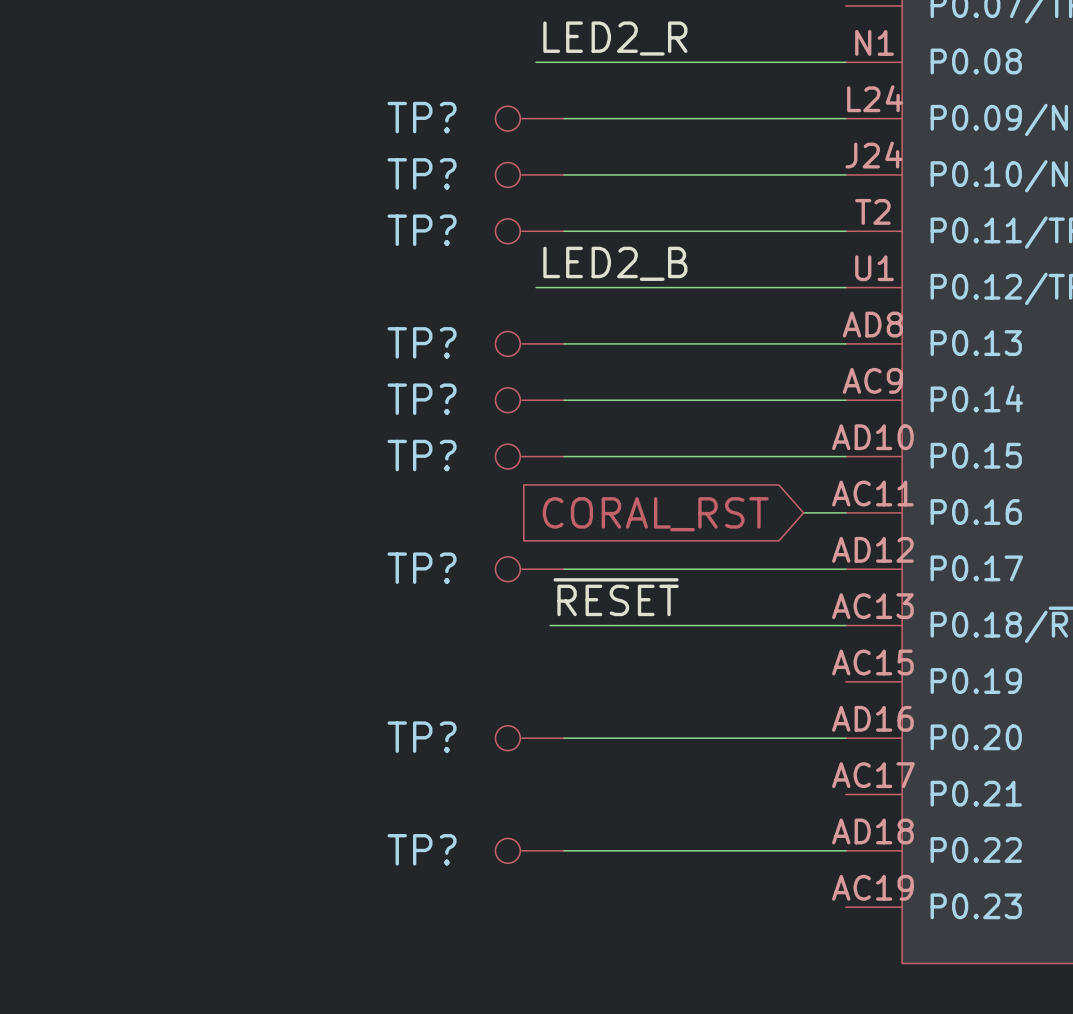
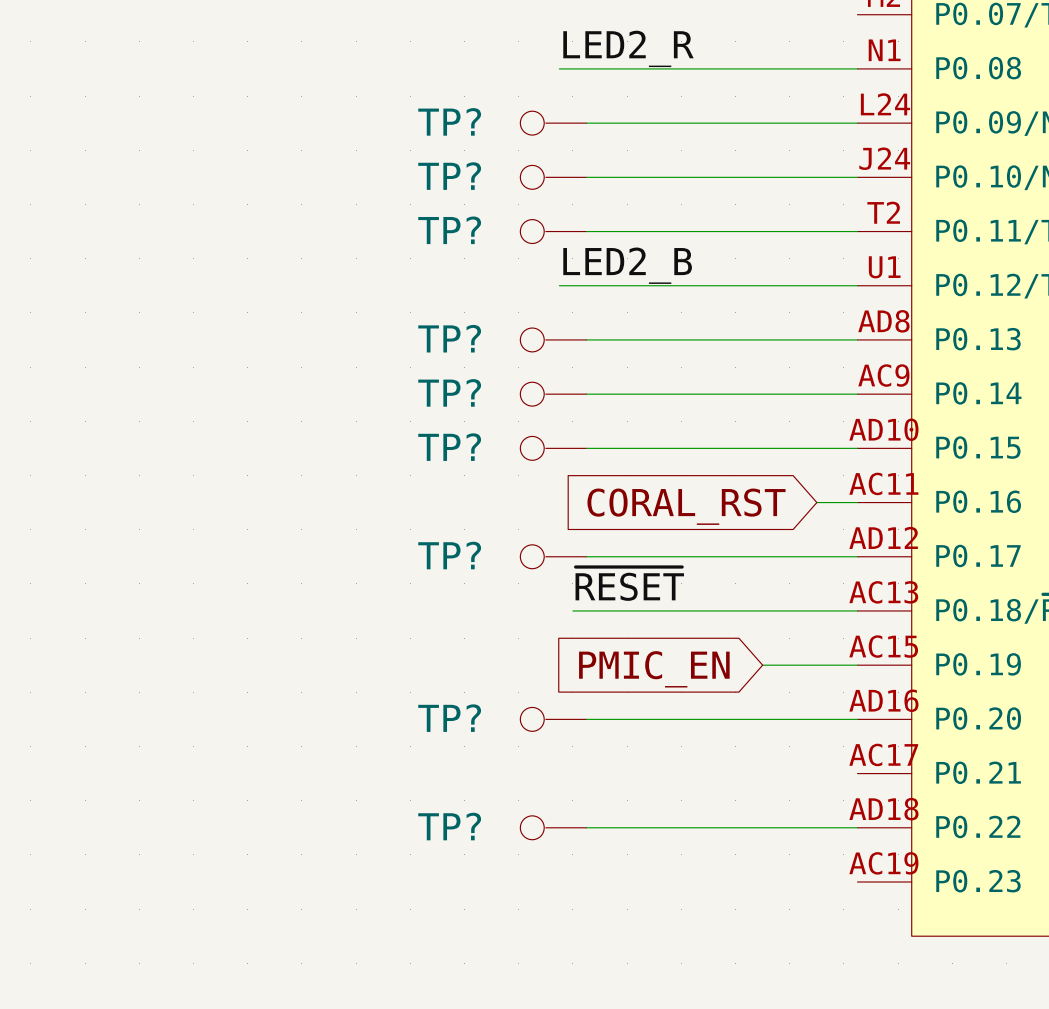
wire: none -> (762, 665) (857, 665)
global label: none -> PMIC_EN (654, 669)

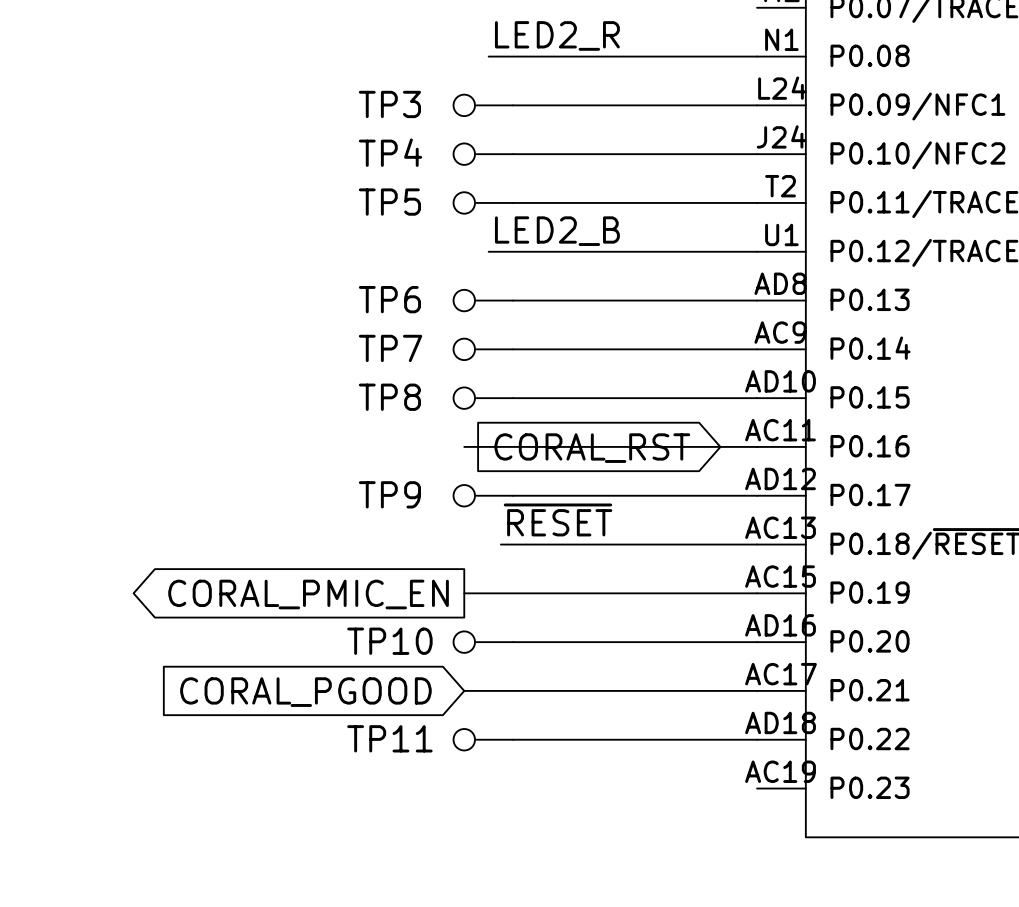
TP? name: TP? (449, 121) -> TP3 (389, 104)
TP? name: TP? (449, 176) -> TP4 (390, 152)
TP? name: TP? (449, 230) -> TP5 (389, 202)
TP? name: TP? (449, 338) -> TP6 (389, 299)
TP? name: TP? (449, 392) -> TP7 (390, 348)
TP? name: TP? (449, 447) -> TP8 (389, 397)
wire: none -> (464, 446) (720, 446)
TP? name: TP? (449, 555) -> TP9 (389, 494)
wire: none -> (464, 593) (671, 593)
global label shape: input (654, 669) -> output (308, 594)
global label: PMIC_EN (654, 669) -> CORAL_PMIC_EN (308, 594)
TP? name: TP? (449, 718) -> TP10 (389, 641)
wire: none -> (464, 690) (757, 690)
global label: none -> CORAL_PGOOD (305, 692)
TP? name: TP? (449, 826) -> TP11 (389, 738)

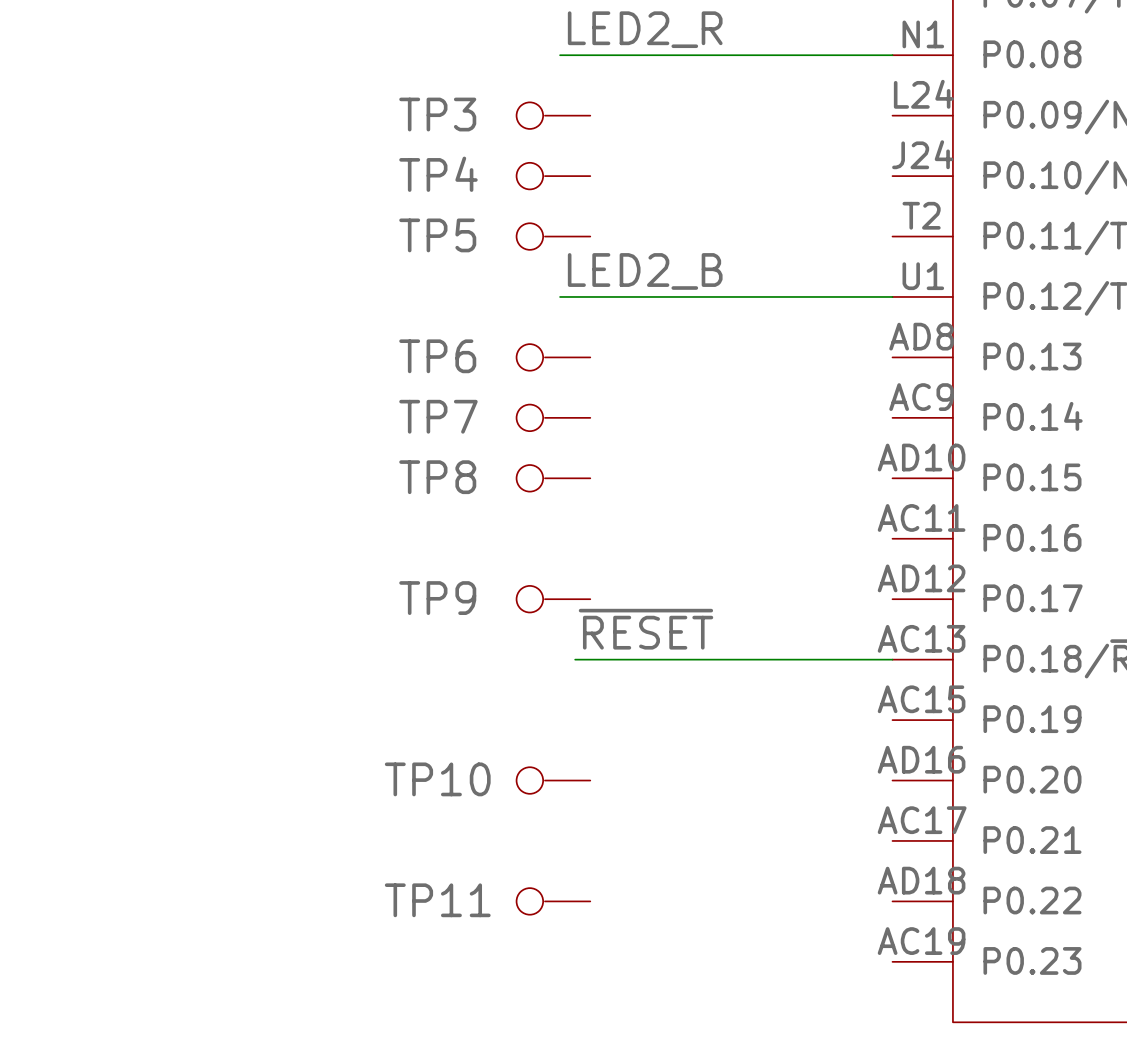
wire: (513, 105) (757, 105) -> none
wire: (513, 154) (757, 154) -> none
wire: (513, 202) (757, 202) -> none
wire: (513, 300) (757, 300) -> none
wire: (513, 349) (757, 349) -> none
wire: (513, 398) (757, 398) -> none
wire: (464, 446) (757, 446) -> none
global label: CORAL_RST (592, 448) -> none
wire: (513, 495) (757, 495) -> none
wire: (464, 593) (757, 593) -> none
global label: CORAL_PMIC_EN (308, 594) -> none
wire: (513, 642) (757, 642) -> none
wire: (464, 690) (757, 690) -> none
global label: CORAL_PGOOD (305, 692) -> none
wire: (513, 739) (757, 739) -> none

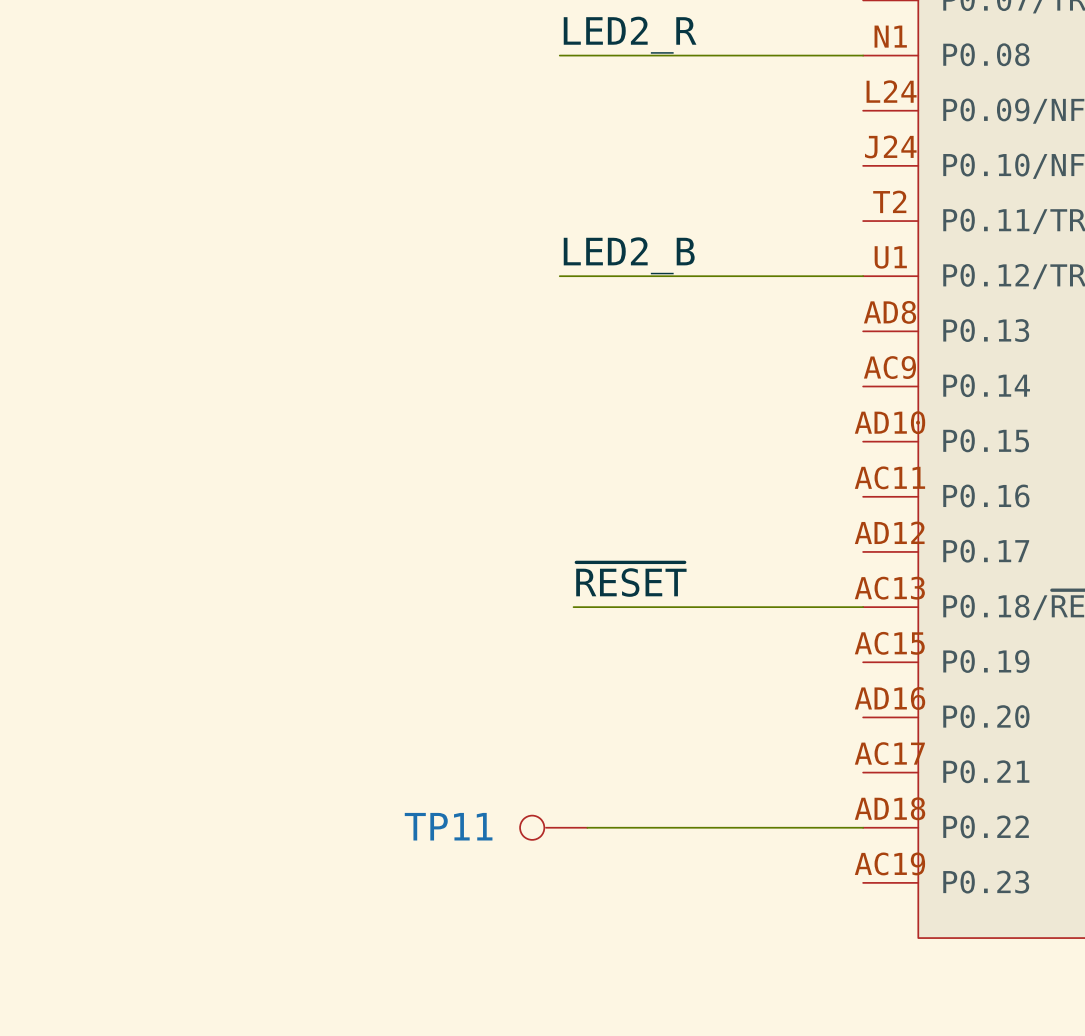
TP3: (553, 115) -> none
TP4: (553, 176) -> none
TP5: (553, 236) -> none
TP6: (553, 357) -> none
TP7: (553, 417) -> none
TP8: (553, 478) -> none
TP9: (553, 599) -> none
TP10: (553, 780) -> none
wire: none -> (587, 827) (863, 827)

